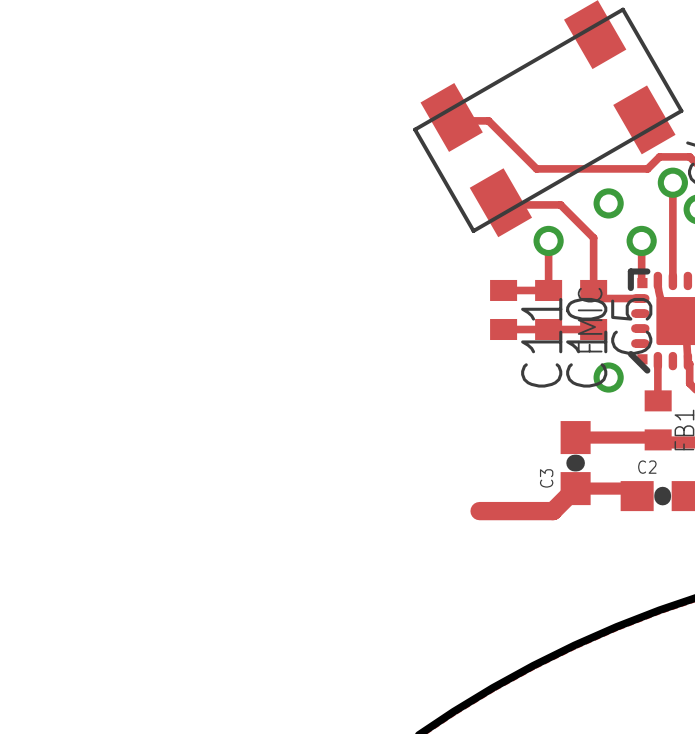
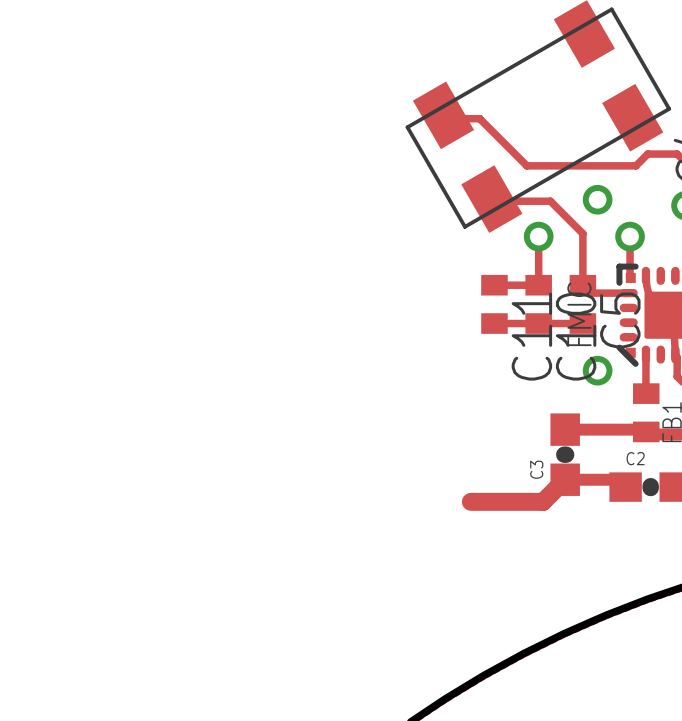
track: (672, 182) (672, 280) -> none
via: (672, 182) -> none

